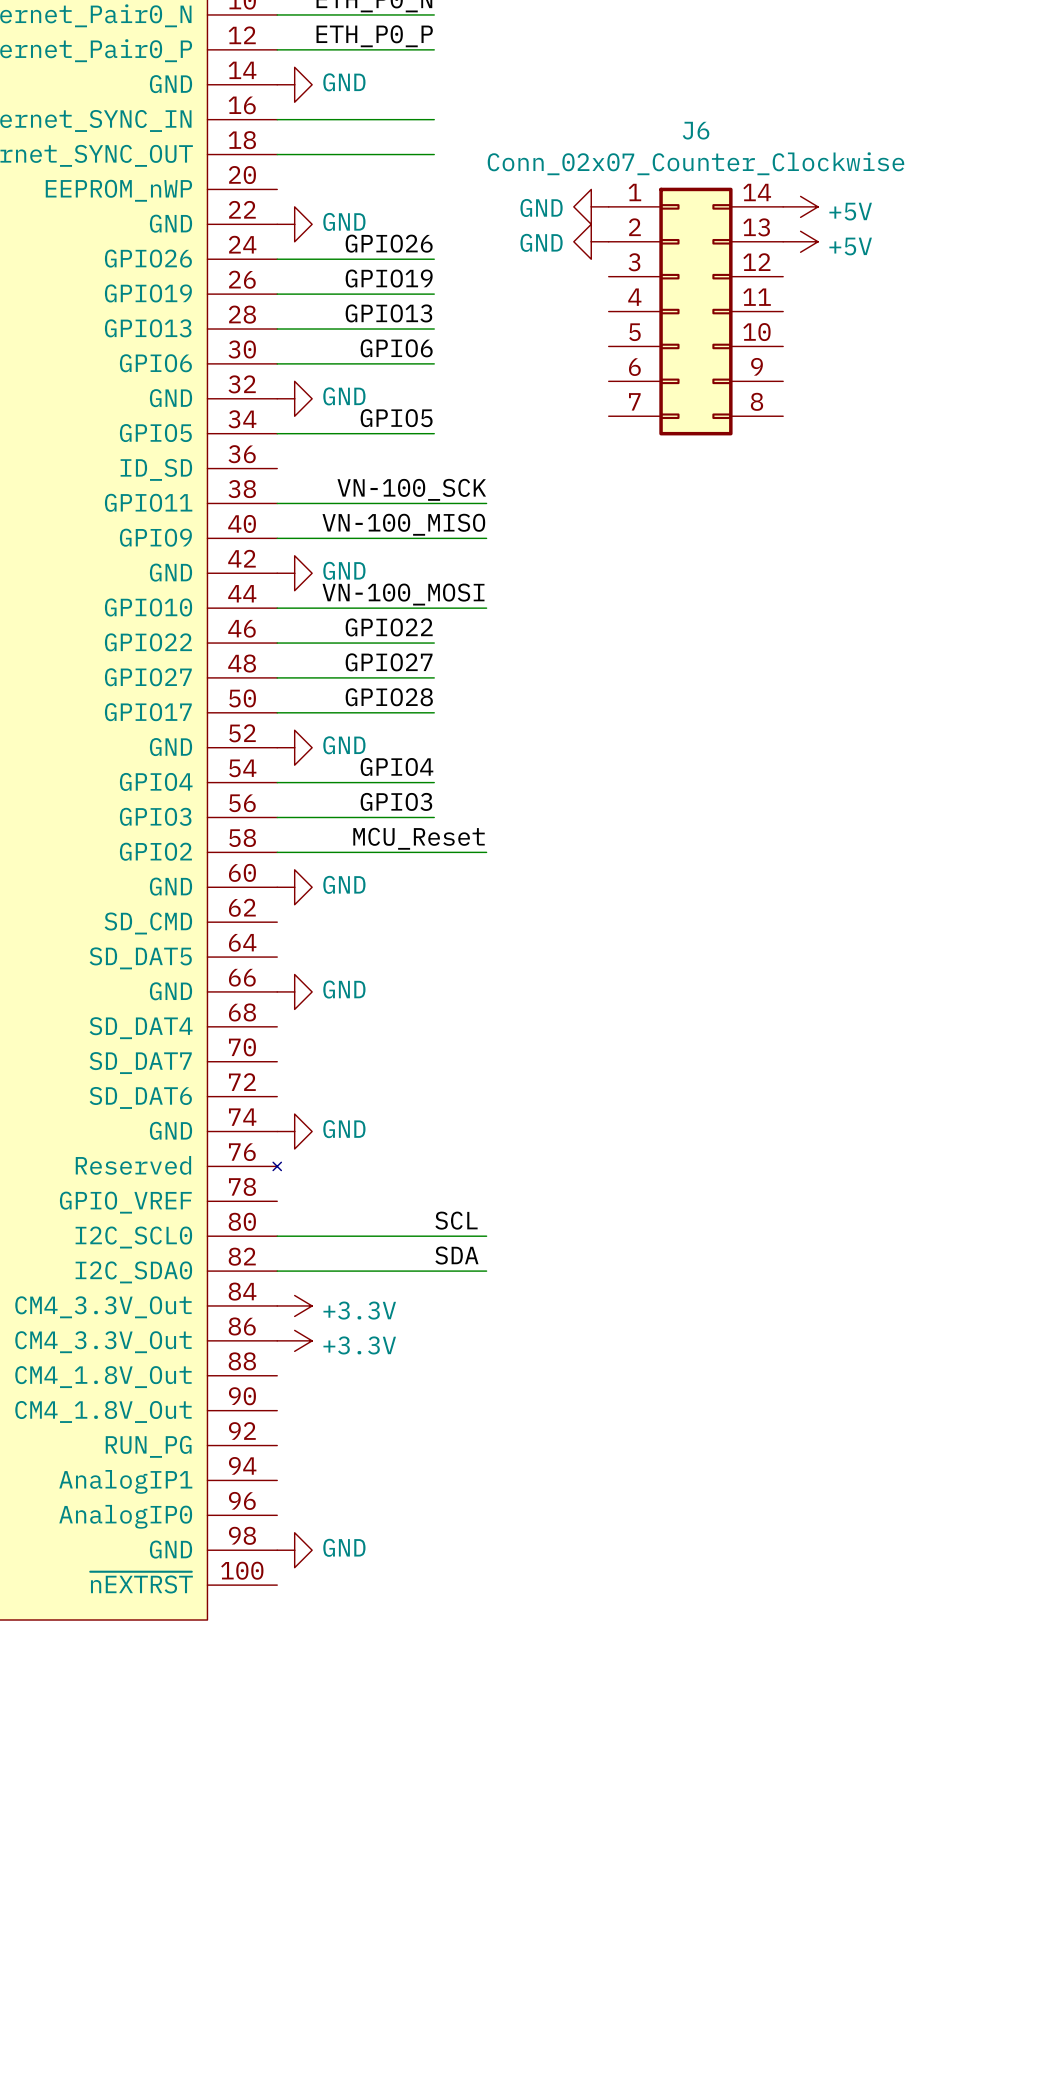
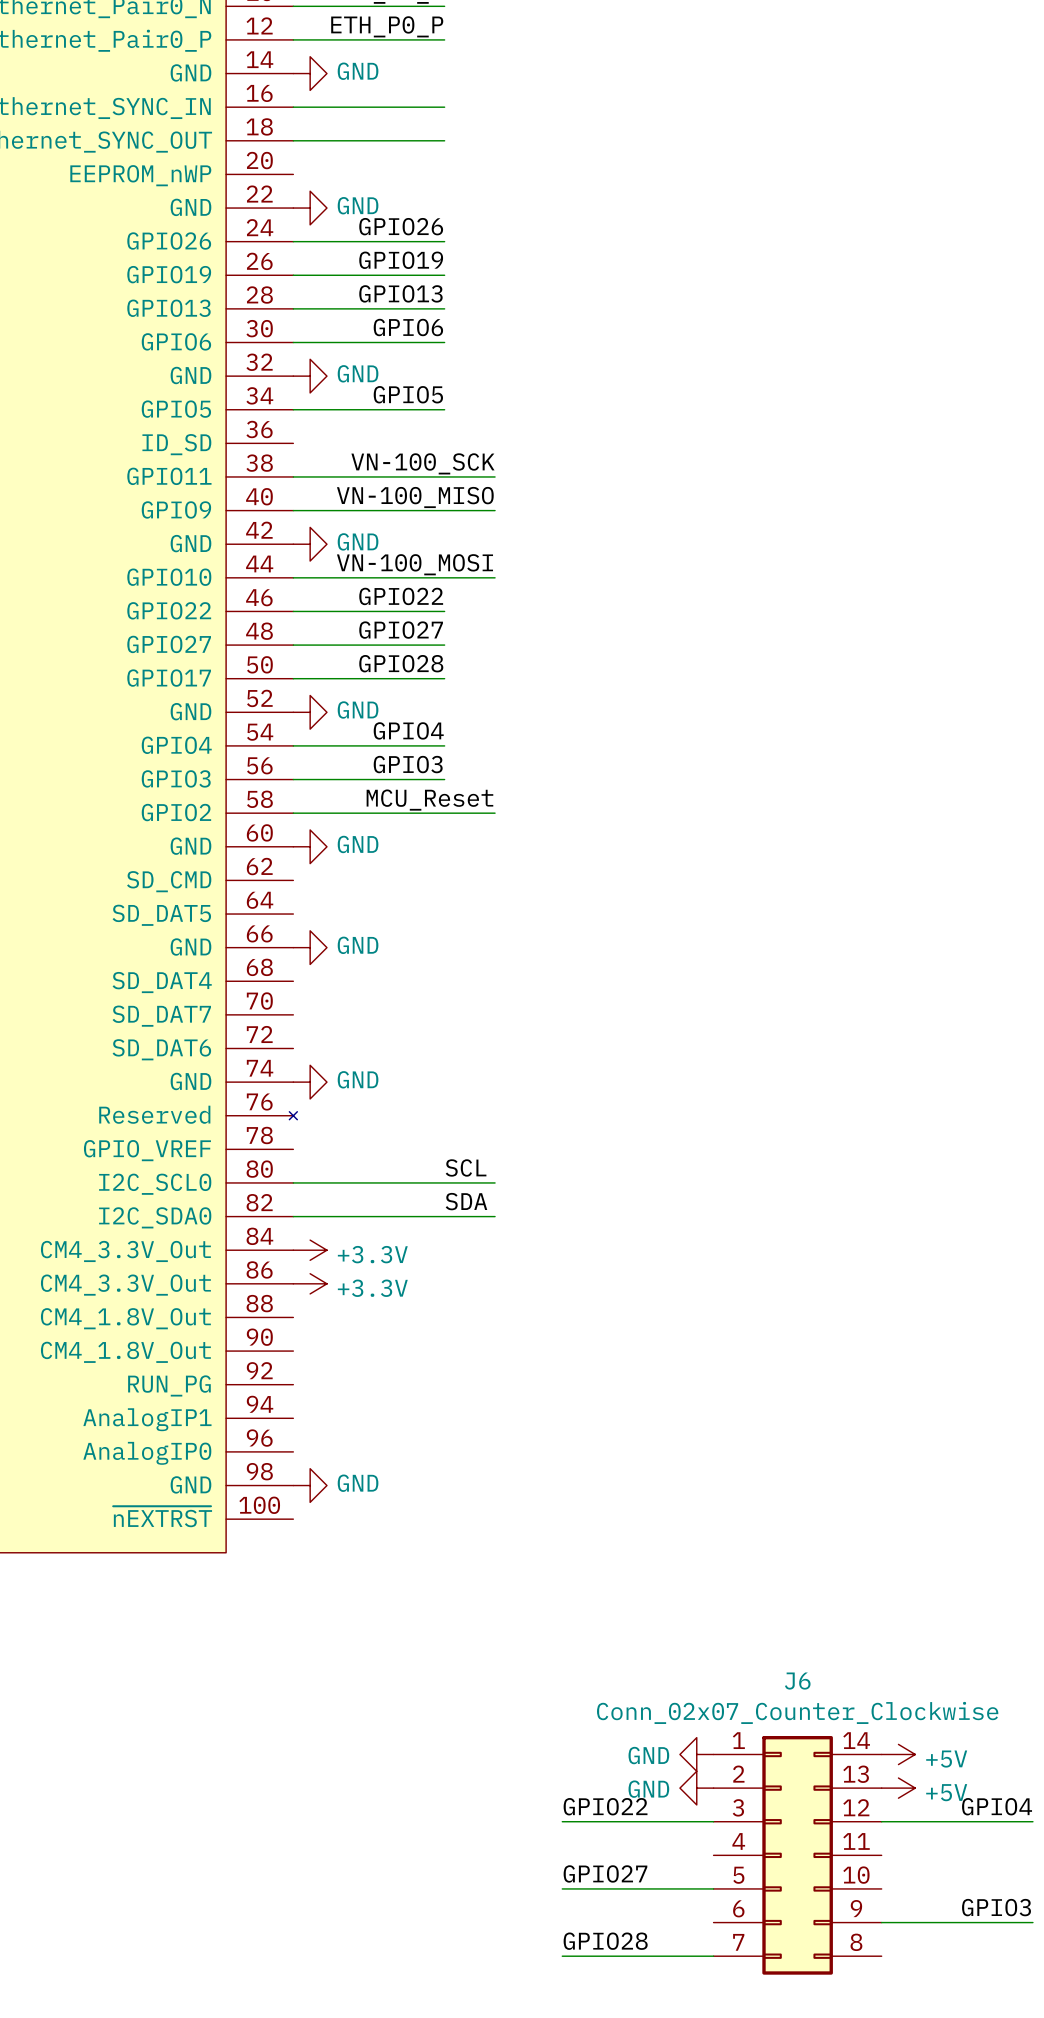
power symbol: GND (591, 206) -> none
power symbol: +5V (800, 206) -> none
power symbol: GND (591, 241) -> none
power symbol: +5V (800, 241) -> none
J6 position: (695, 311) -> (797, 1855)
power symbol: none -> GND (696, 1754)
power symbol: none -> +5V (898, 1754)
power symbol: none -> GND (696, 1788)
power symbol: none -> +5V (898, 1788)
label: none -> GPIO22 (605, 1806)
label: none -> GPIO4 (997, 1806)
wire: none -> (562, 1821) (713, 1821)
wire: none -> (881, 1821) (1032, 1821)
label: none -> GPIO27 (605, 1873)
wire: none -> (562, 1888) (713, 1888)
label: none -> GPIO3 (996, 1907)
wire: none -> (881, 1922) (1032, 1922)
label: none -> GPIO28 (605, 1941)
wire: none -> (562, 1956) (713, 1956)

